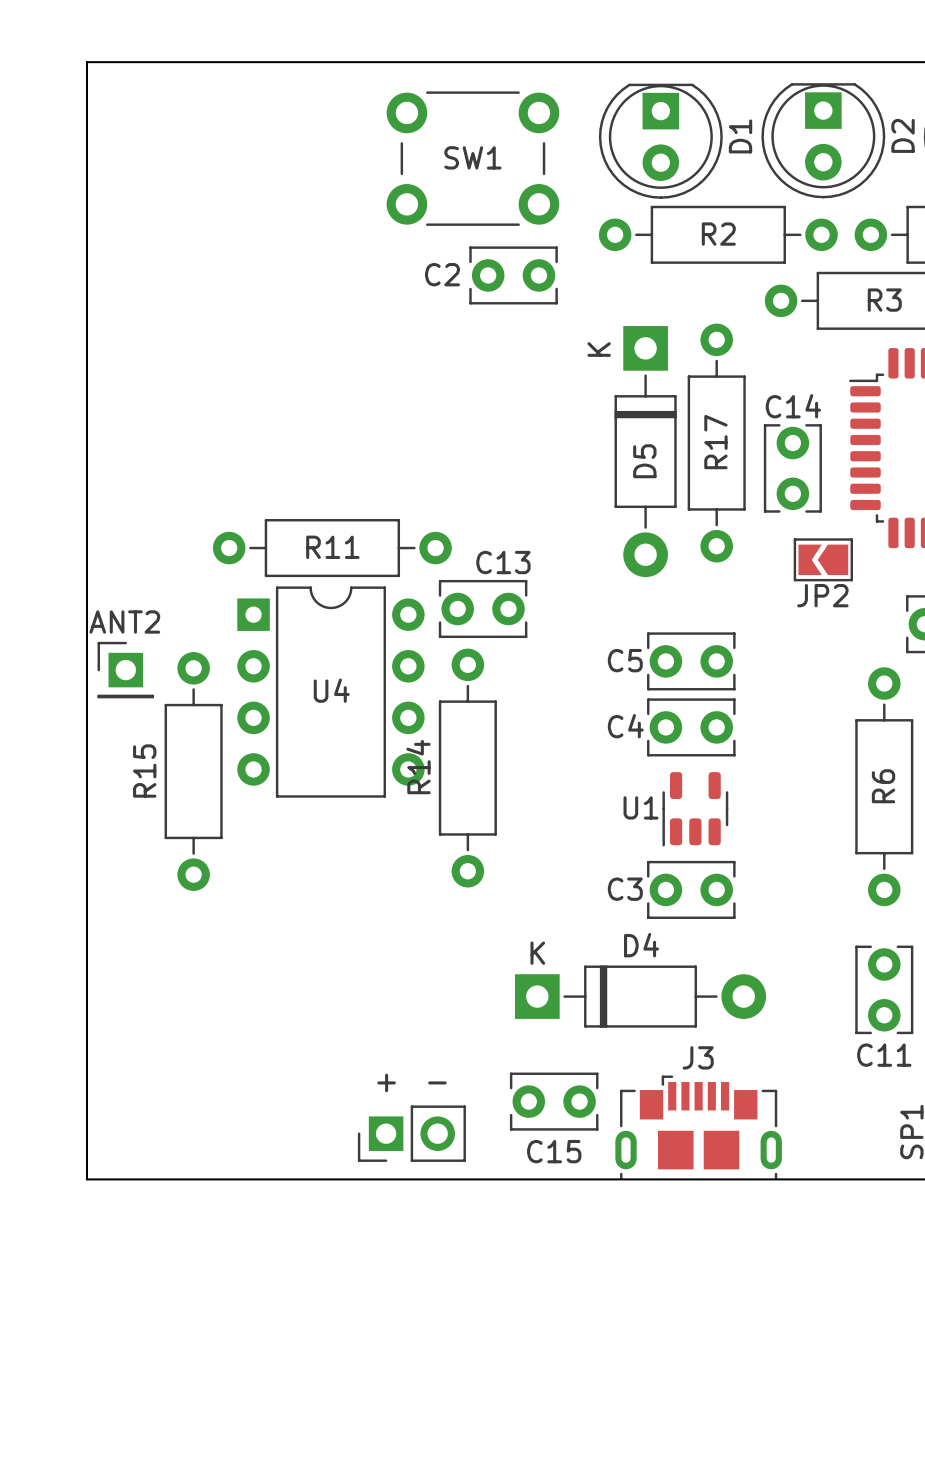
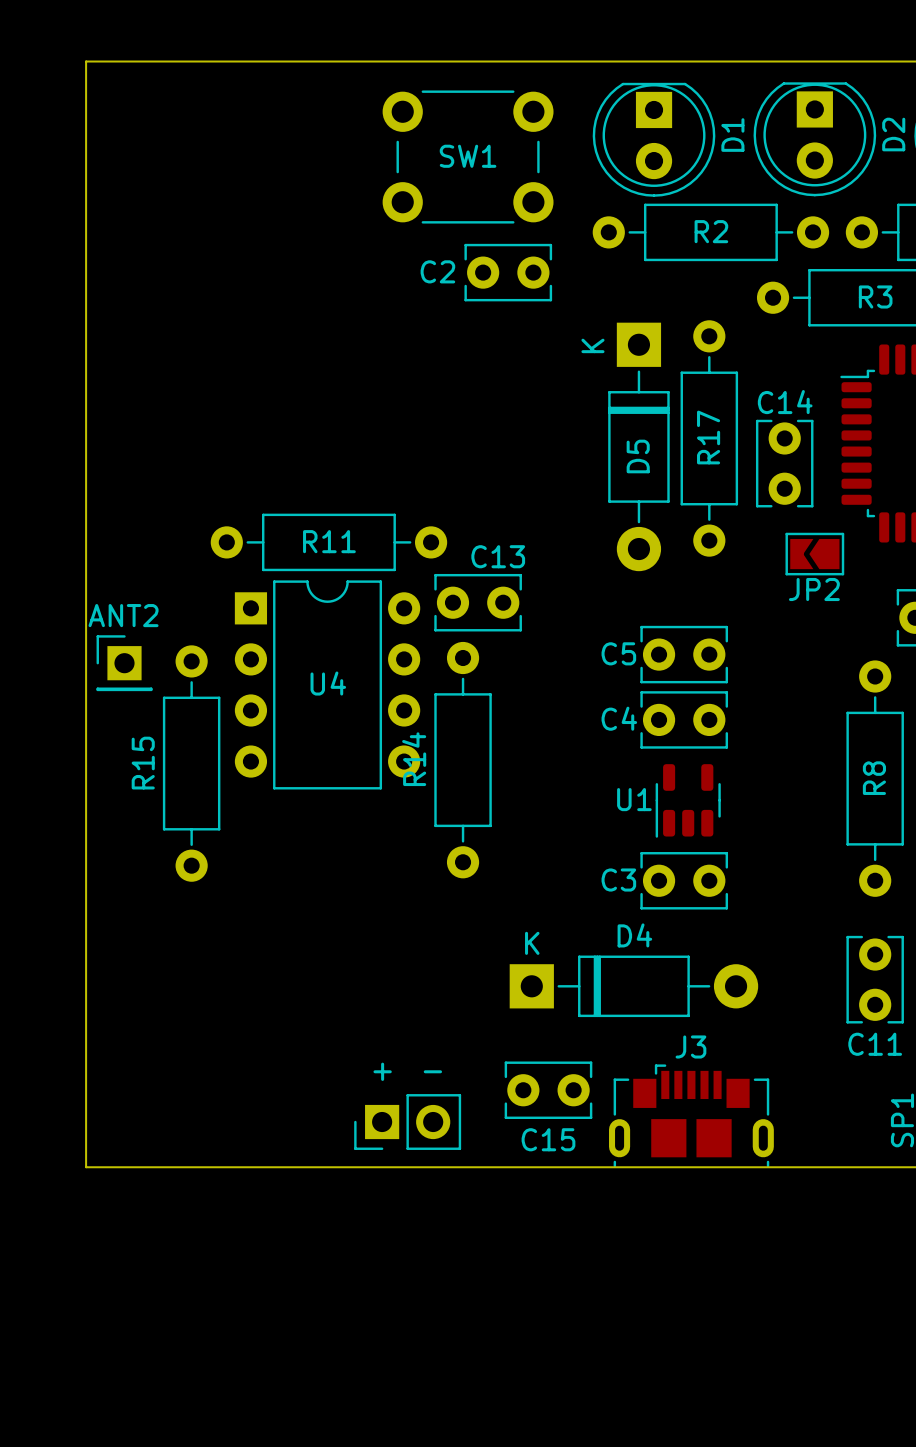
R6 name: R6 (883, 786) -> R8 (874, 778)

